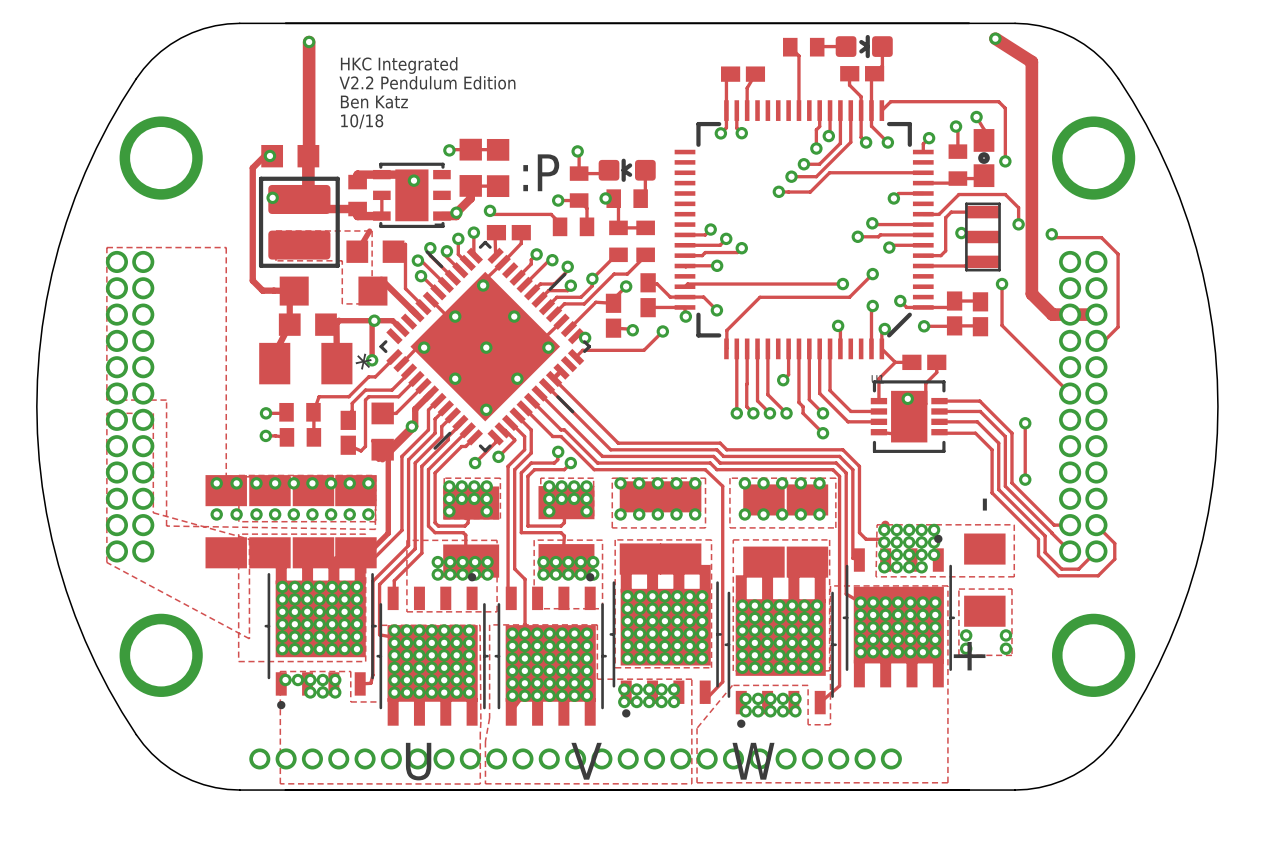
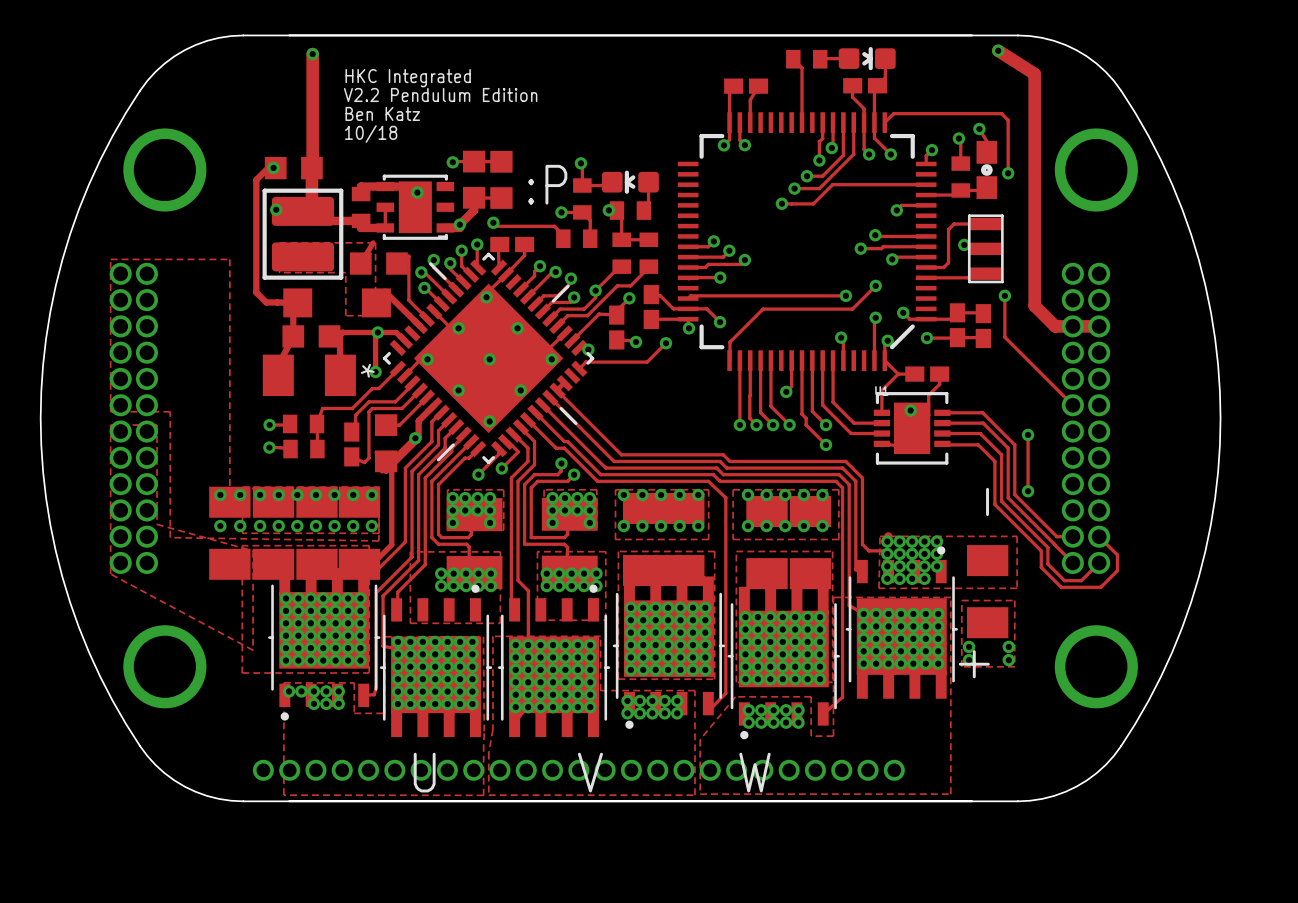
track: (923, 214) (939, 214) (958, 194) (1005, 194) (1018, 207) (1018, 224) -> none
via: (1018, 224) -> none
track: (1051, 234) (1055, 237) (1101, 237) (1118, 254) (1118, 327) (1104, 340) (1096, 340) -> none
via: (1051, 234) -> none

